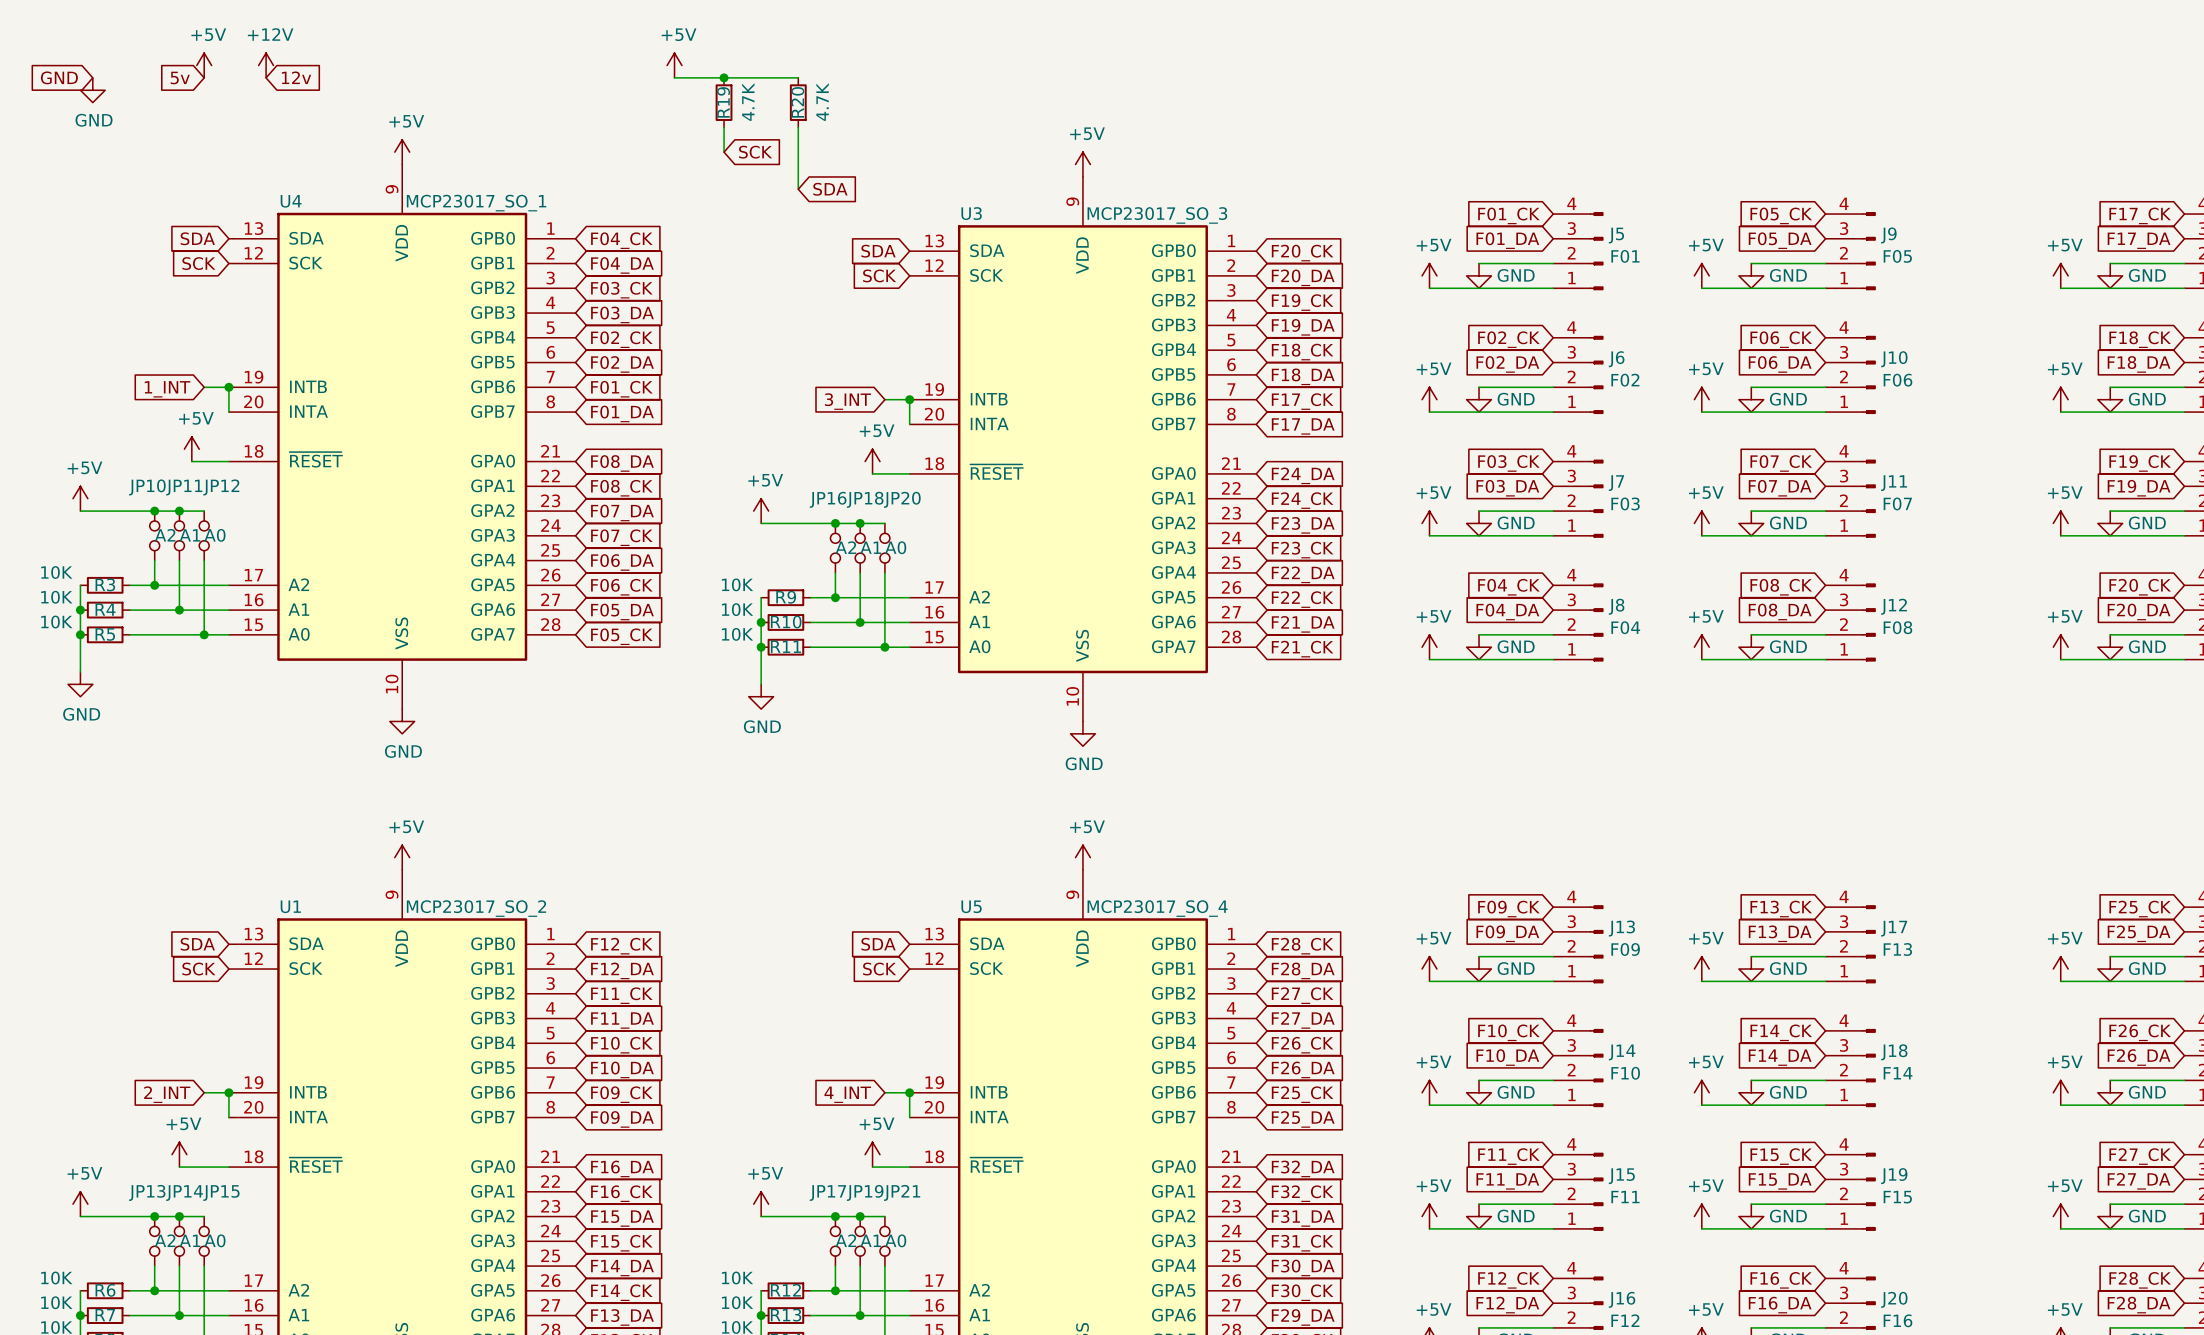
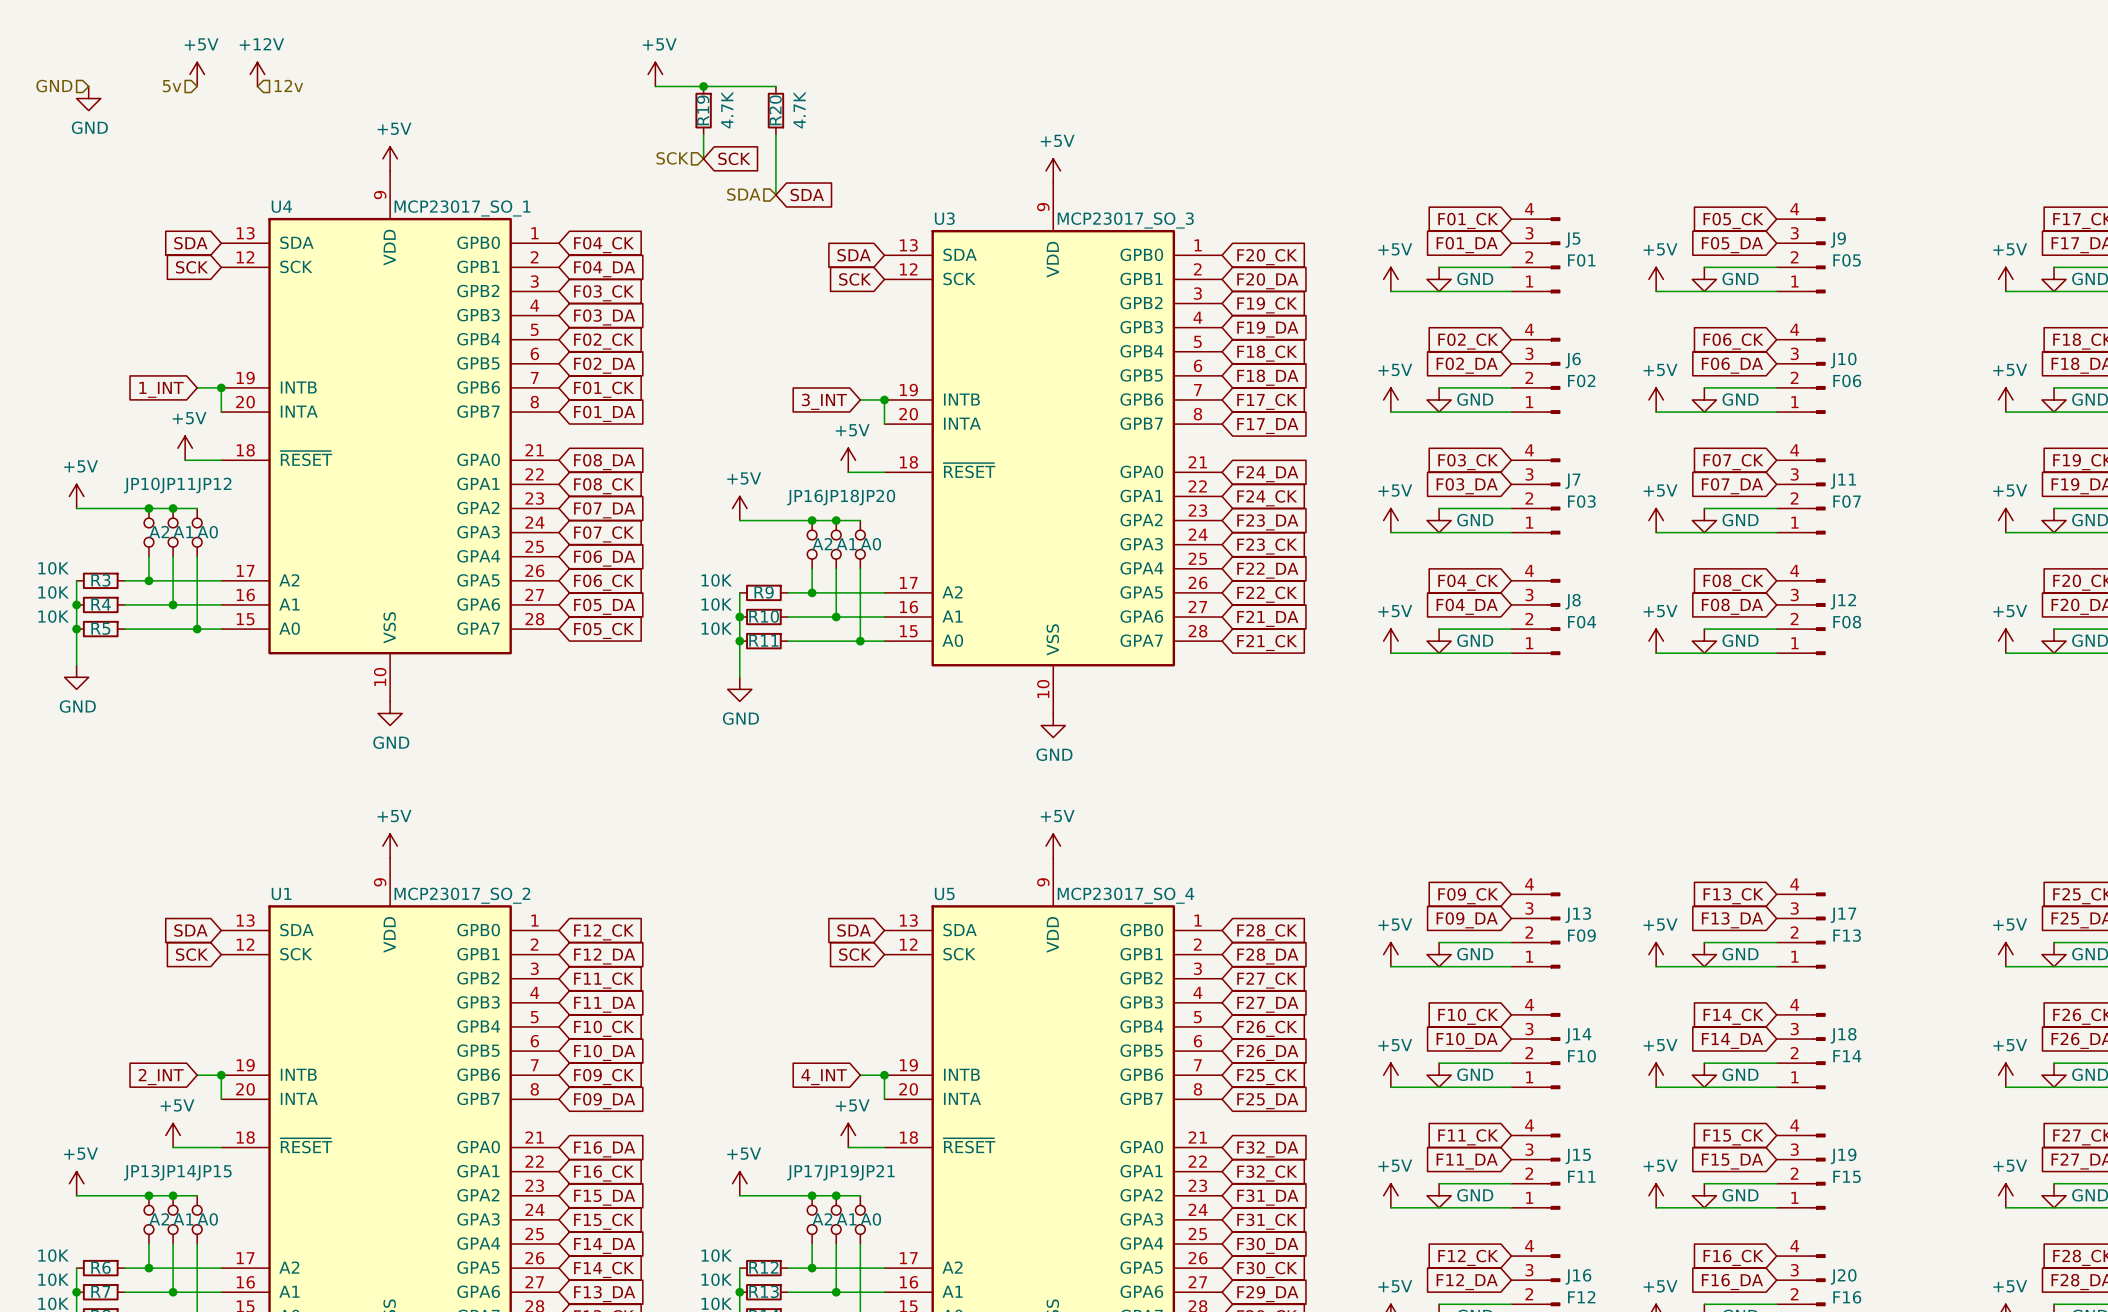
hierarchical label: none -> GND (54, 86)
global label: GND (59, 77) -> none
hierarchical label: none -> 5v (172, 86)
global label: 12v (296, 77) -> none
hierarchical label: none -> 12v (288, 85)
global label: 5v (180, 78) -> none
hierarchical label: none -> SCK (672, 158)
hierarchical label: none -> SDA (743, 194)

